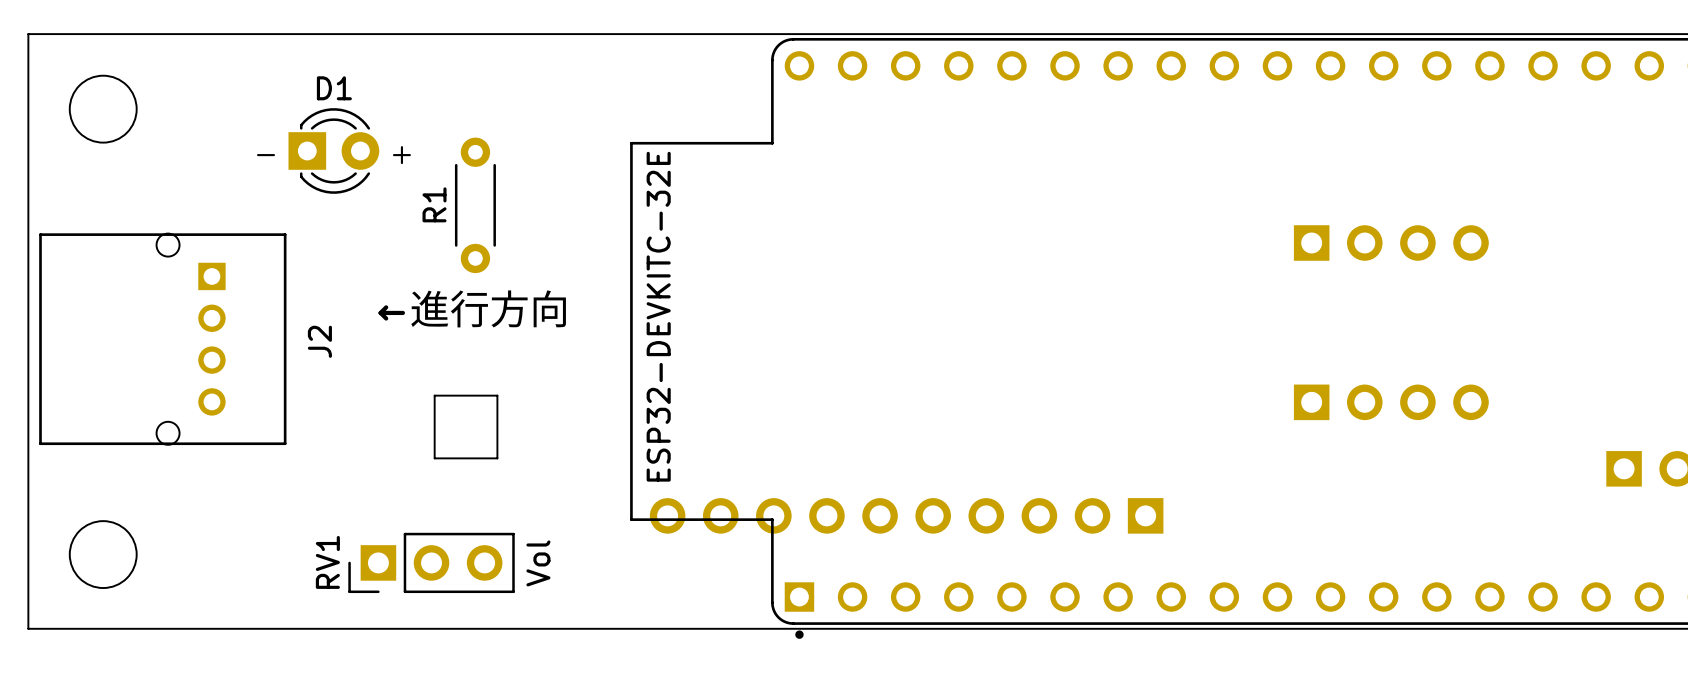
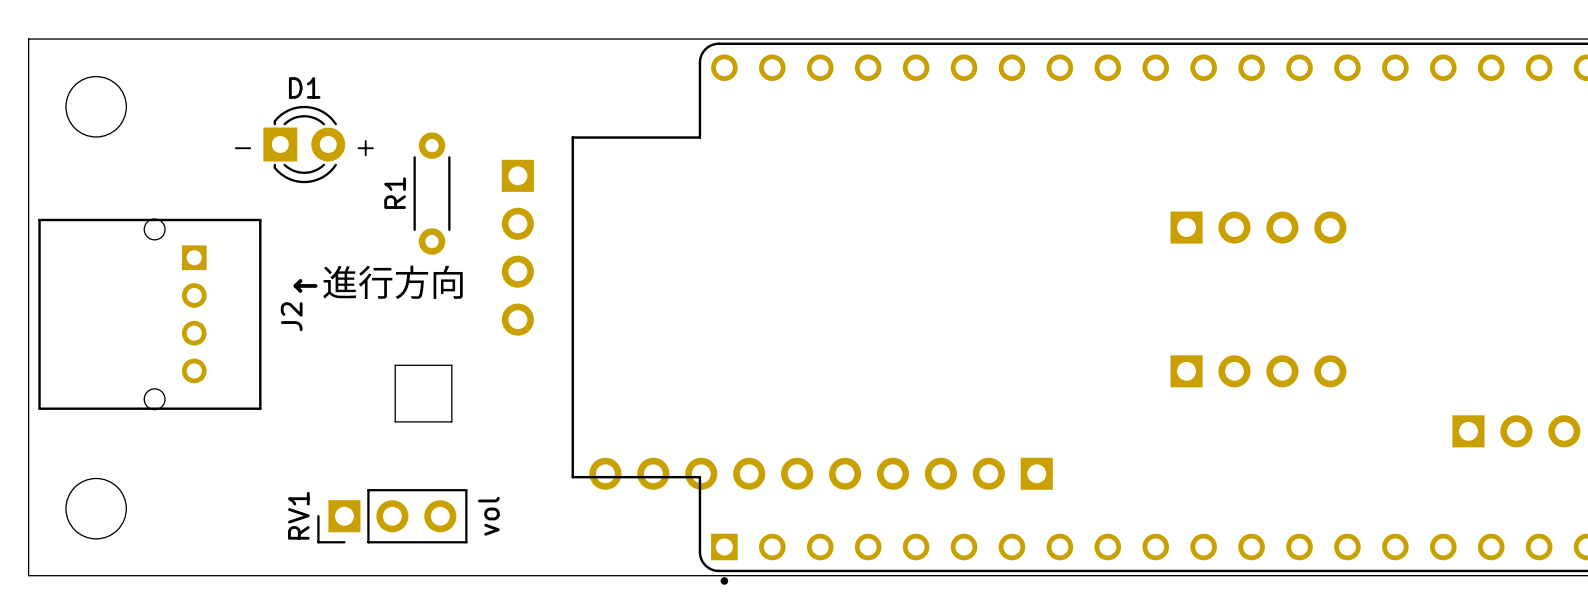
part: none -> (517, 247)
text position: ←進行方向 (473, 308) -> ←進行方向 (379, 282)
part value: ESP32-DEVKITC-32E (658, 316) -> none
RV1 value: Vol (538, 563) -> vol (488, 516)

